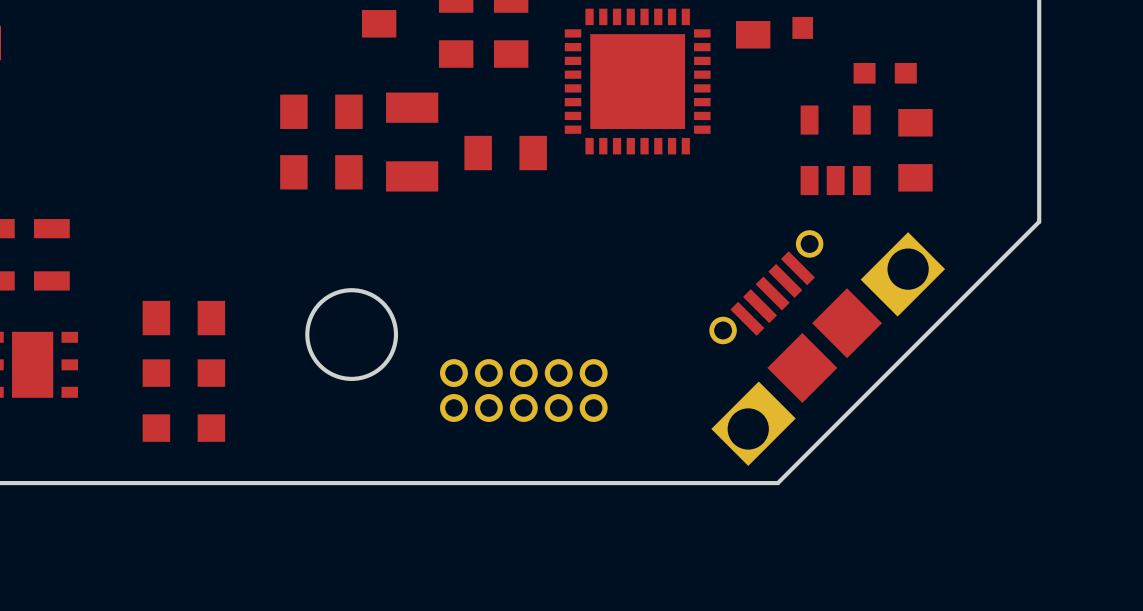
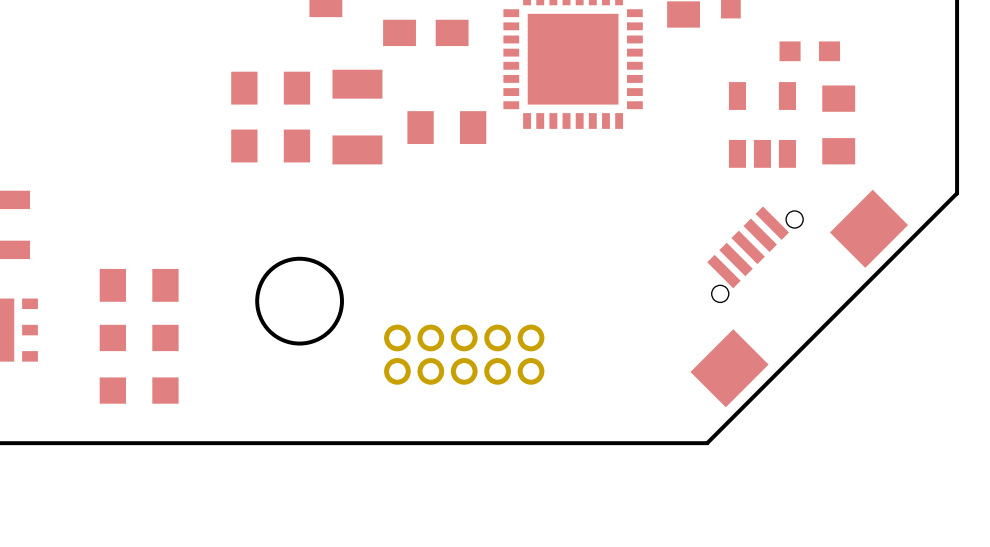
part: none -> (799, 298)
part: (827, 348) -> none

